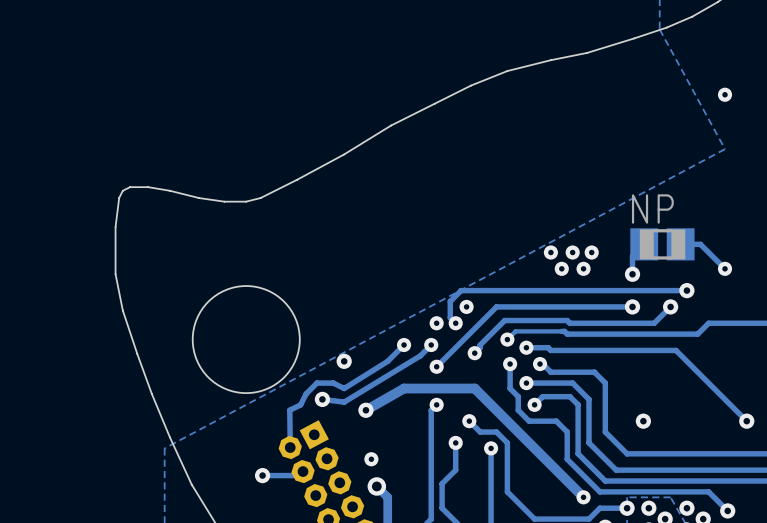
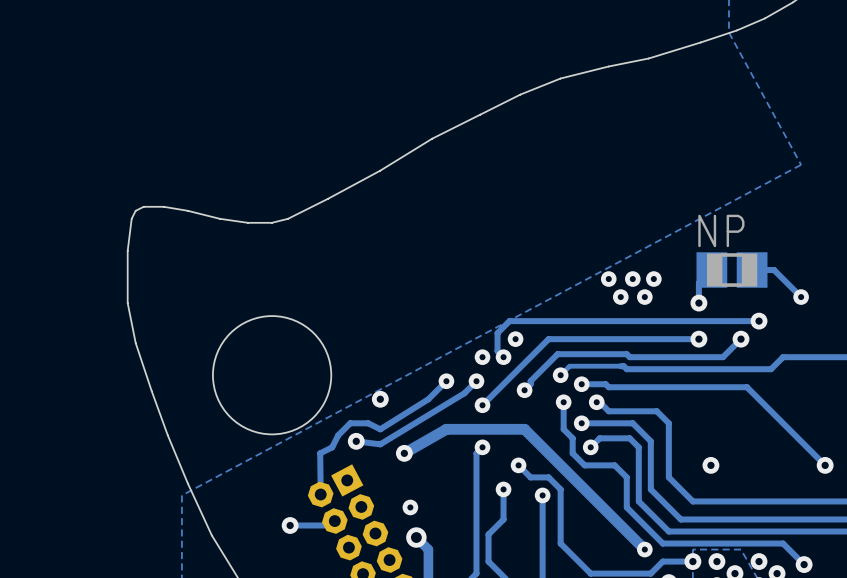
via: (725, 94) -> none

